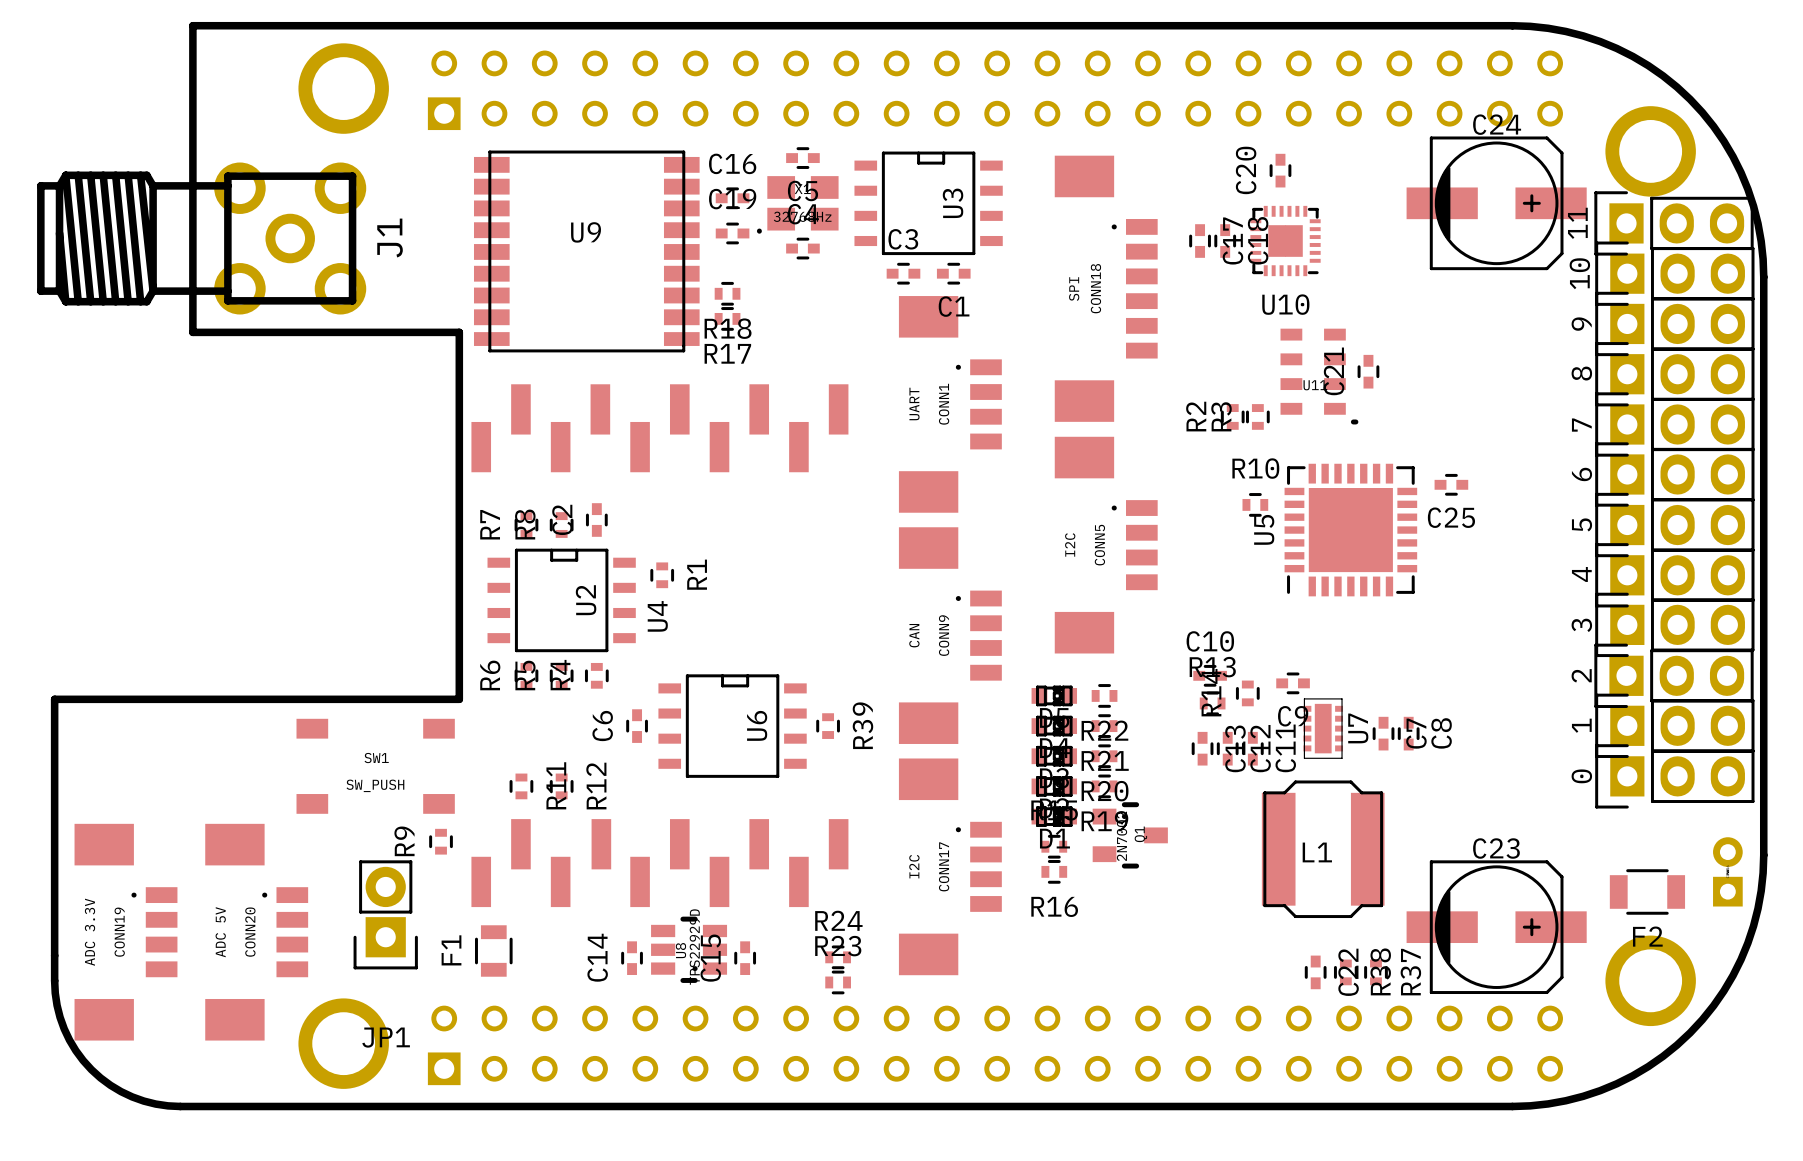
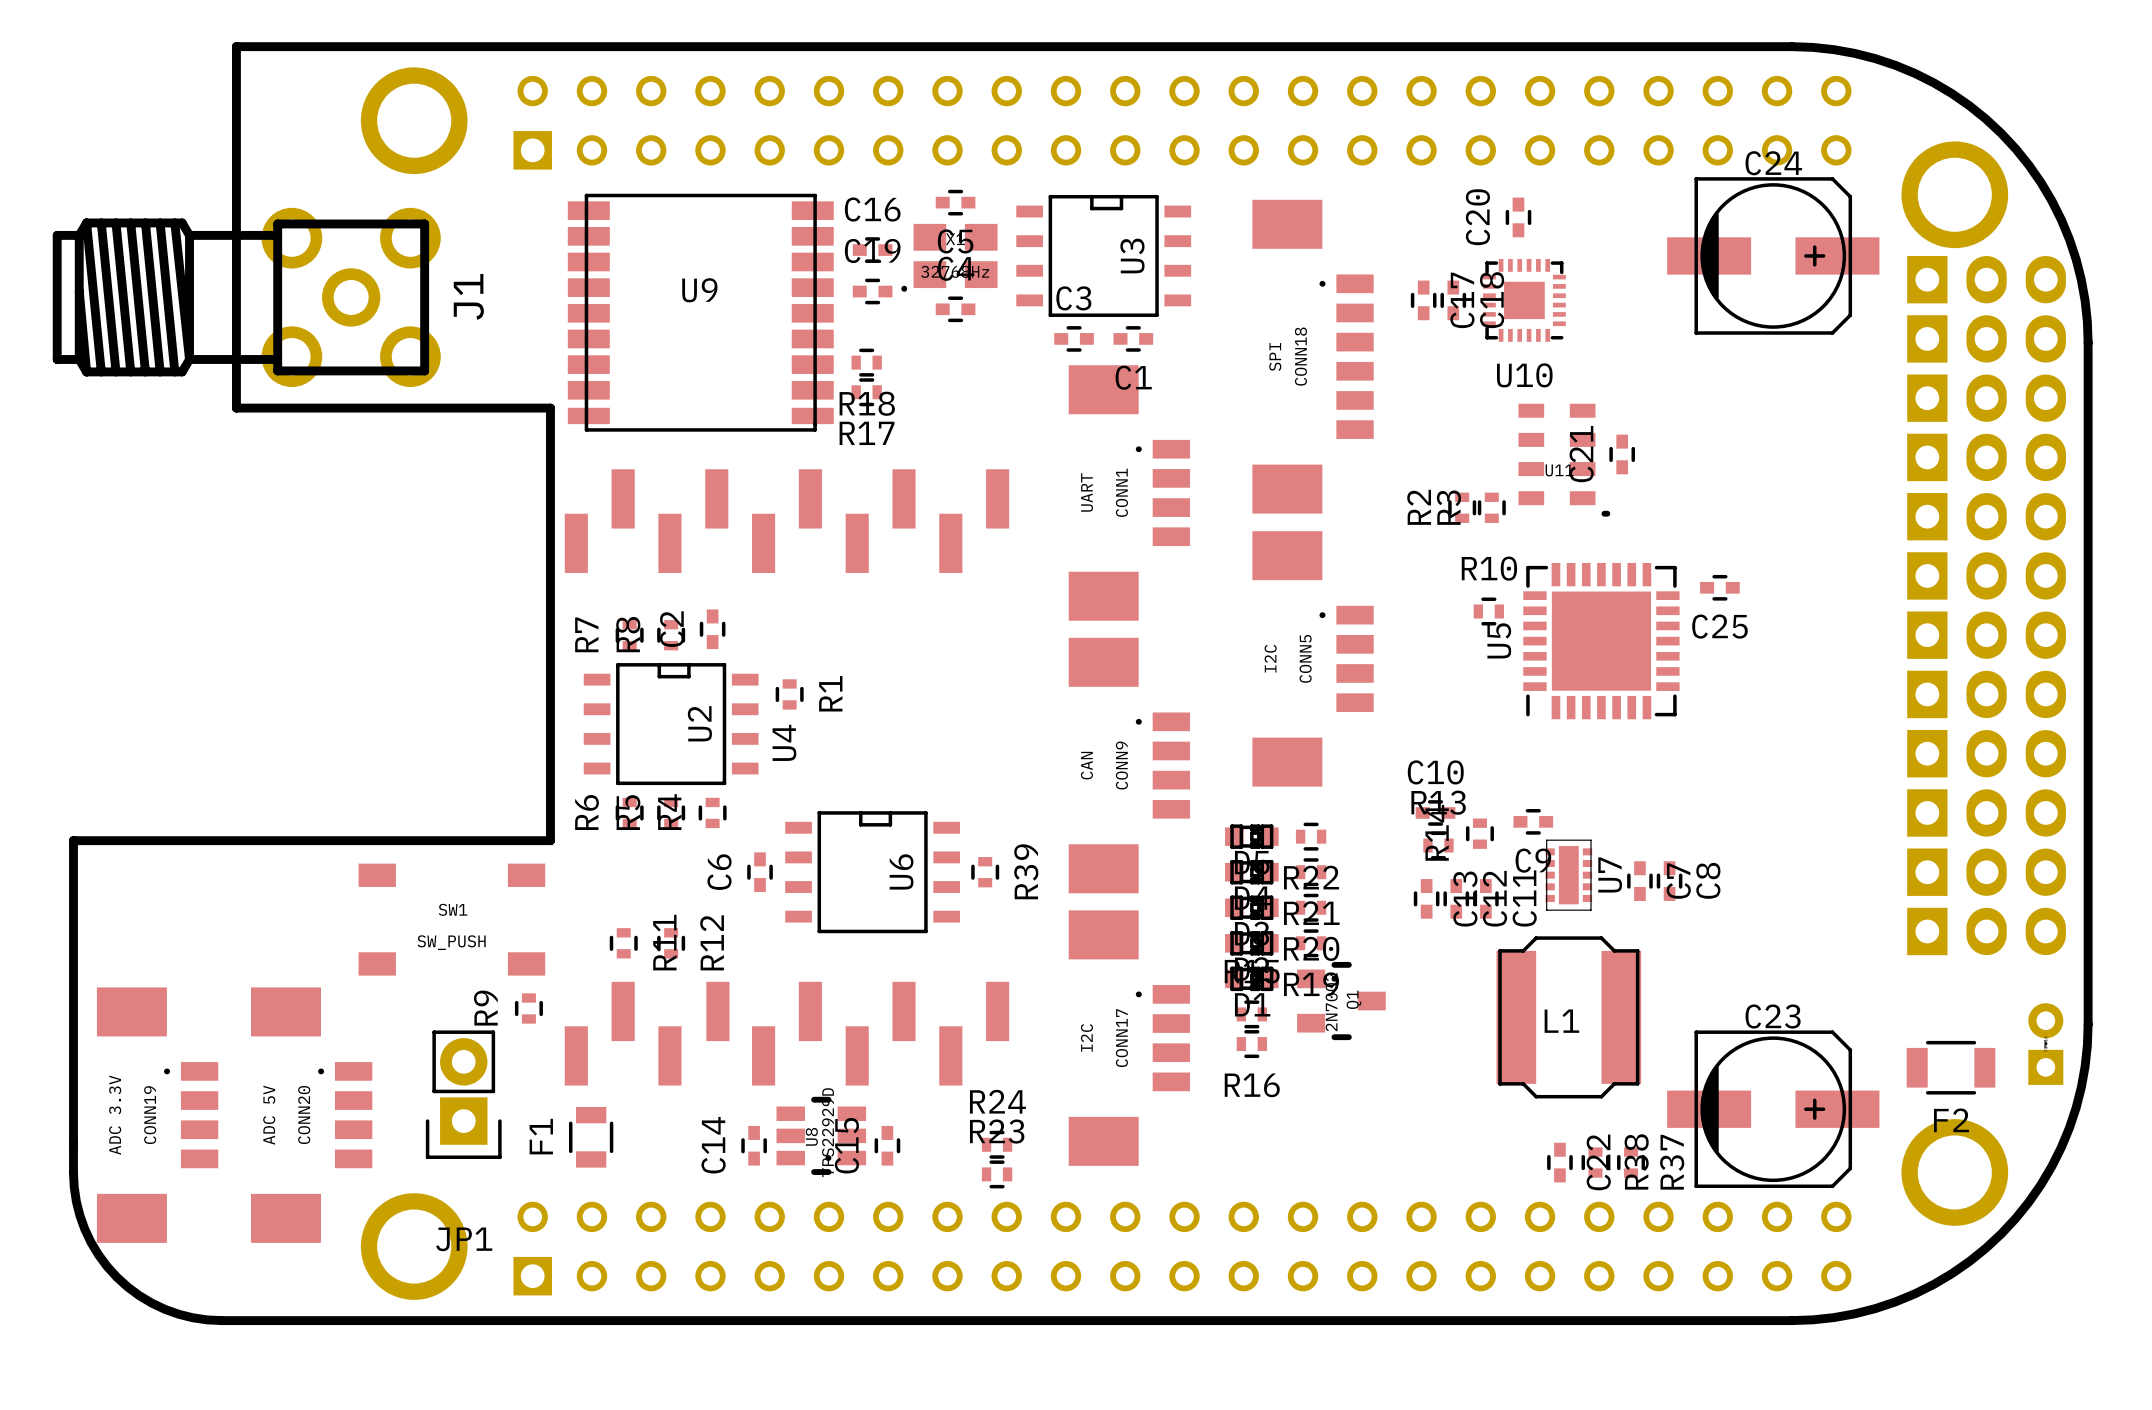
11 side: top (1674, 223) -> bottom (1986, 279)
10 side: top (1674, 273) -> bottom (1986, 338)
9 side: top (1674, 323) -> bottom (1986, 398)
8 side: top (1674, 374) -> bottom (1986, 457)
7 side: top (1674, 424) -> bottom (1986, 516)
6 side: top (1674, 474) -> bottom (1986, 575)
5 side: top (1674, 525) -> bottom (1986, 635)
4 side: top (1674, 575) -> bottom (1986, 694)
3 side: top (1674, 624) -> bottom (1986, 753)
2 side: top (1674, 675) -> bottom (1986, 812)
1 side: top (1674, 725) -> bottom (1986, 872)
0 side: top (1674, 776) -> bottom (1986, 931)

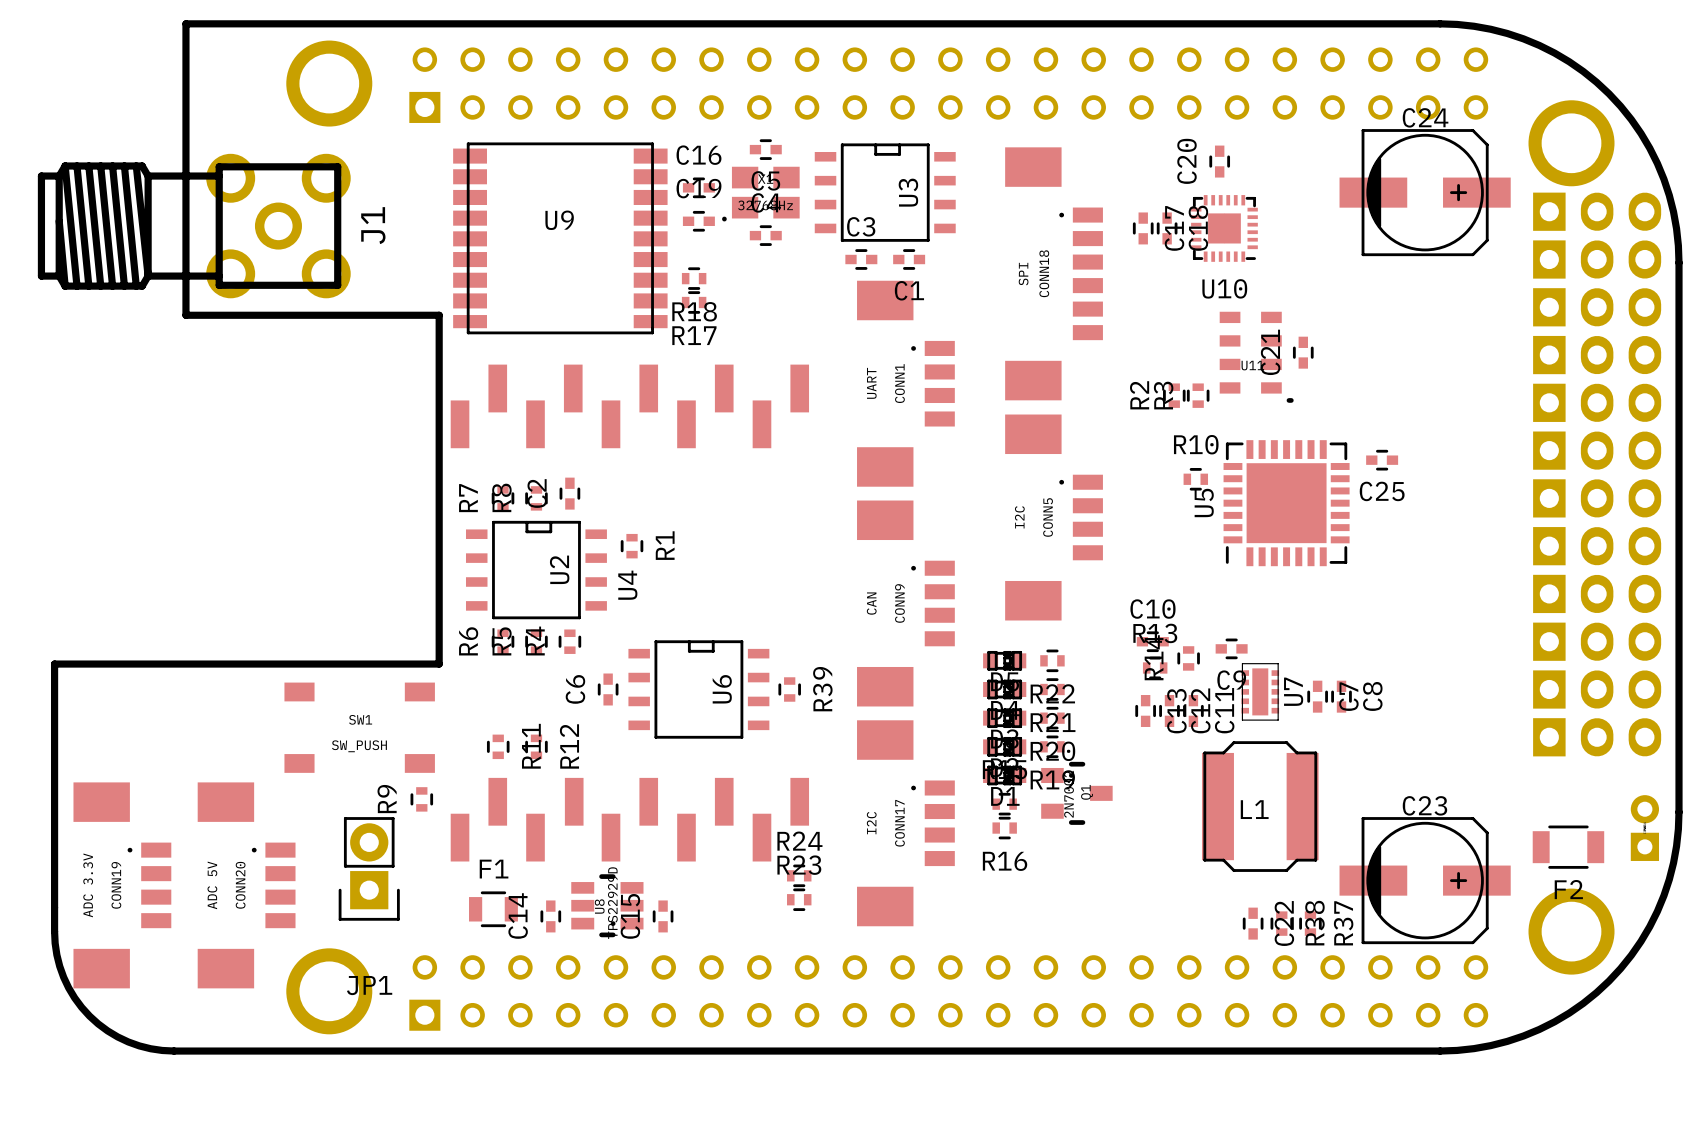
U8 position: (821, 1135) -> (607, 905)
F1 rotation: 0° (591, 1137) -> 90° clockwise (493, 909)
R24 position: (997, 1144) -> (799, 875)
C14 position: (754, 1145) -> (550, 916)
C15 position: (887, 1145) -> (663, 916)
R23 position: (997, 1174) -> (799, 899)

